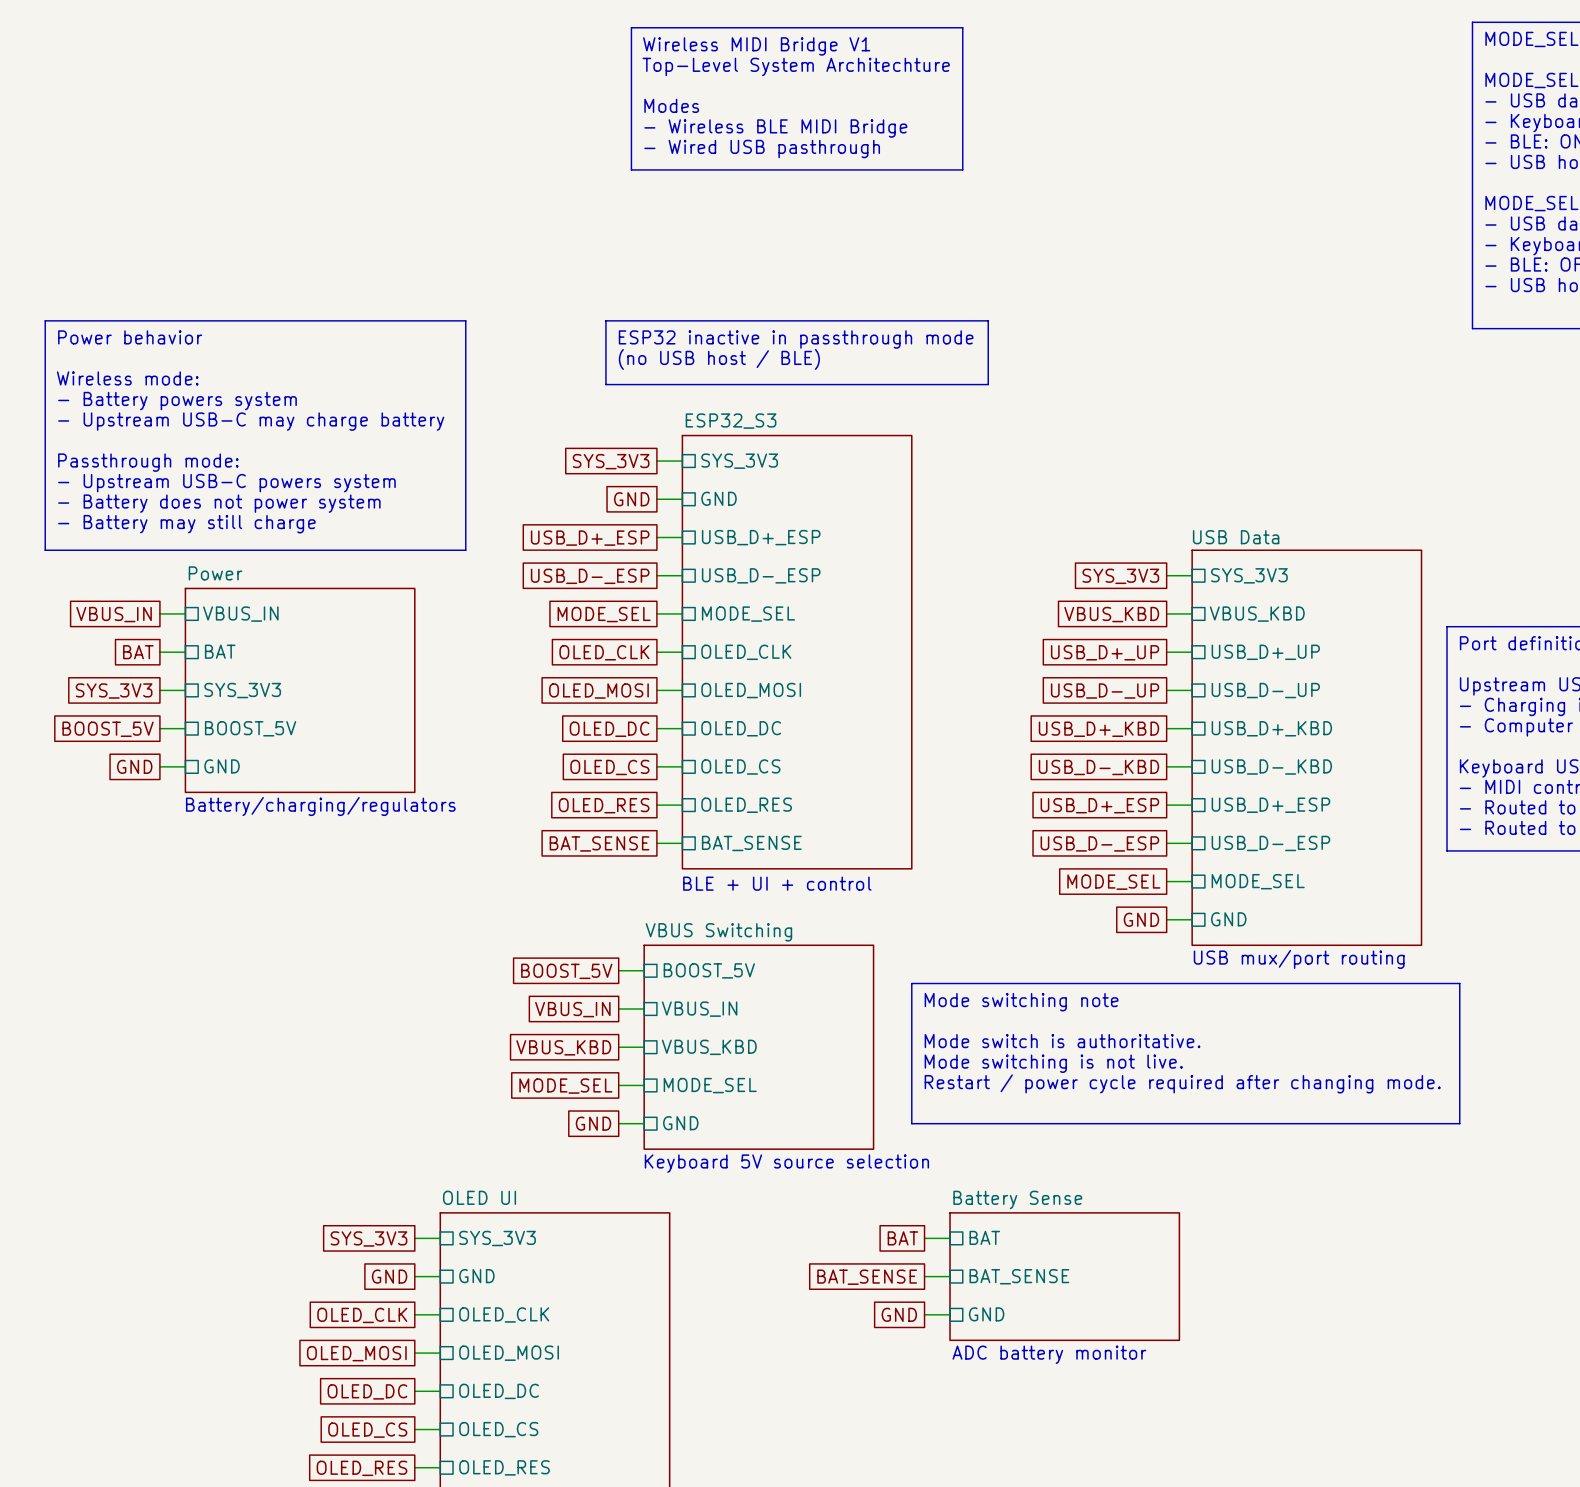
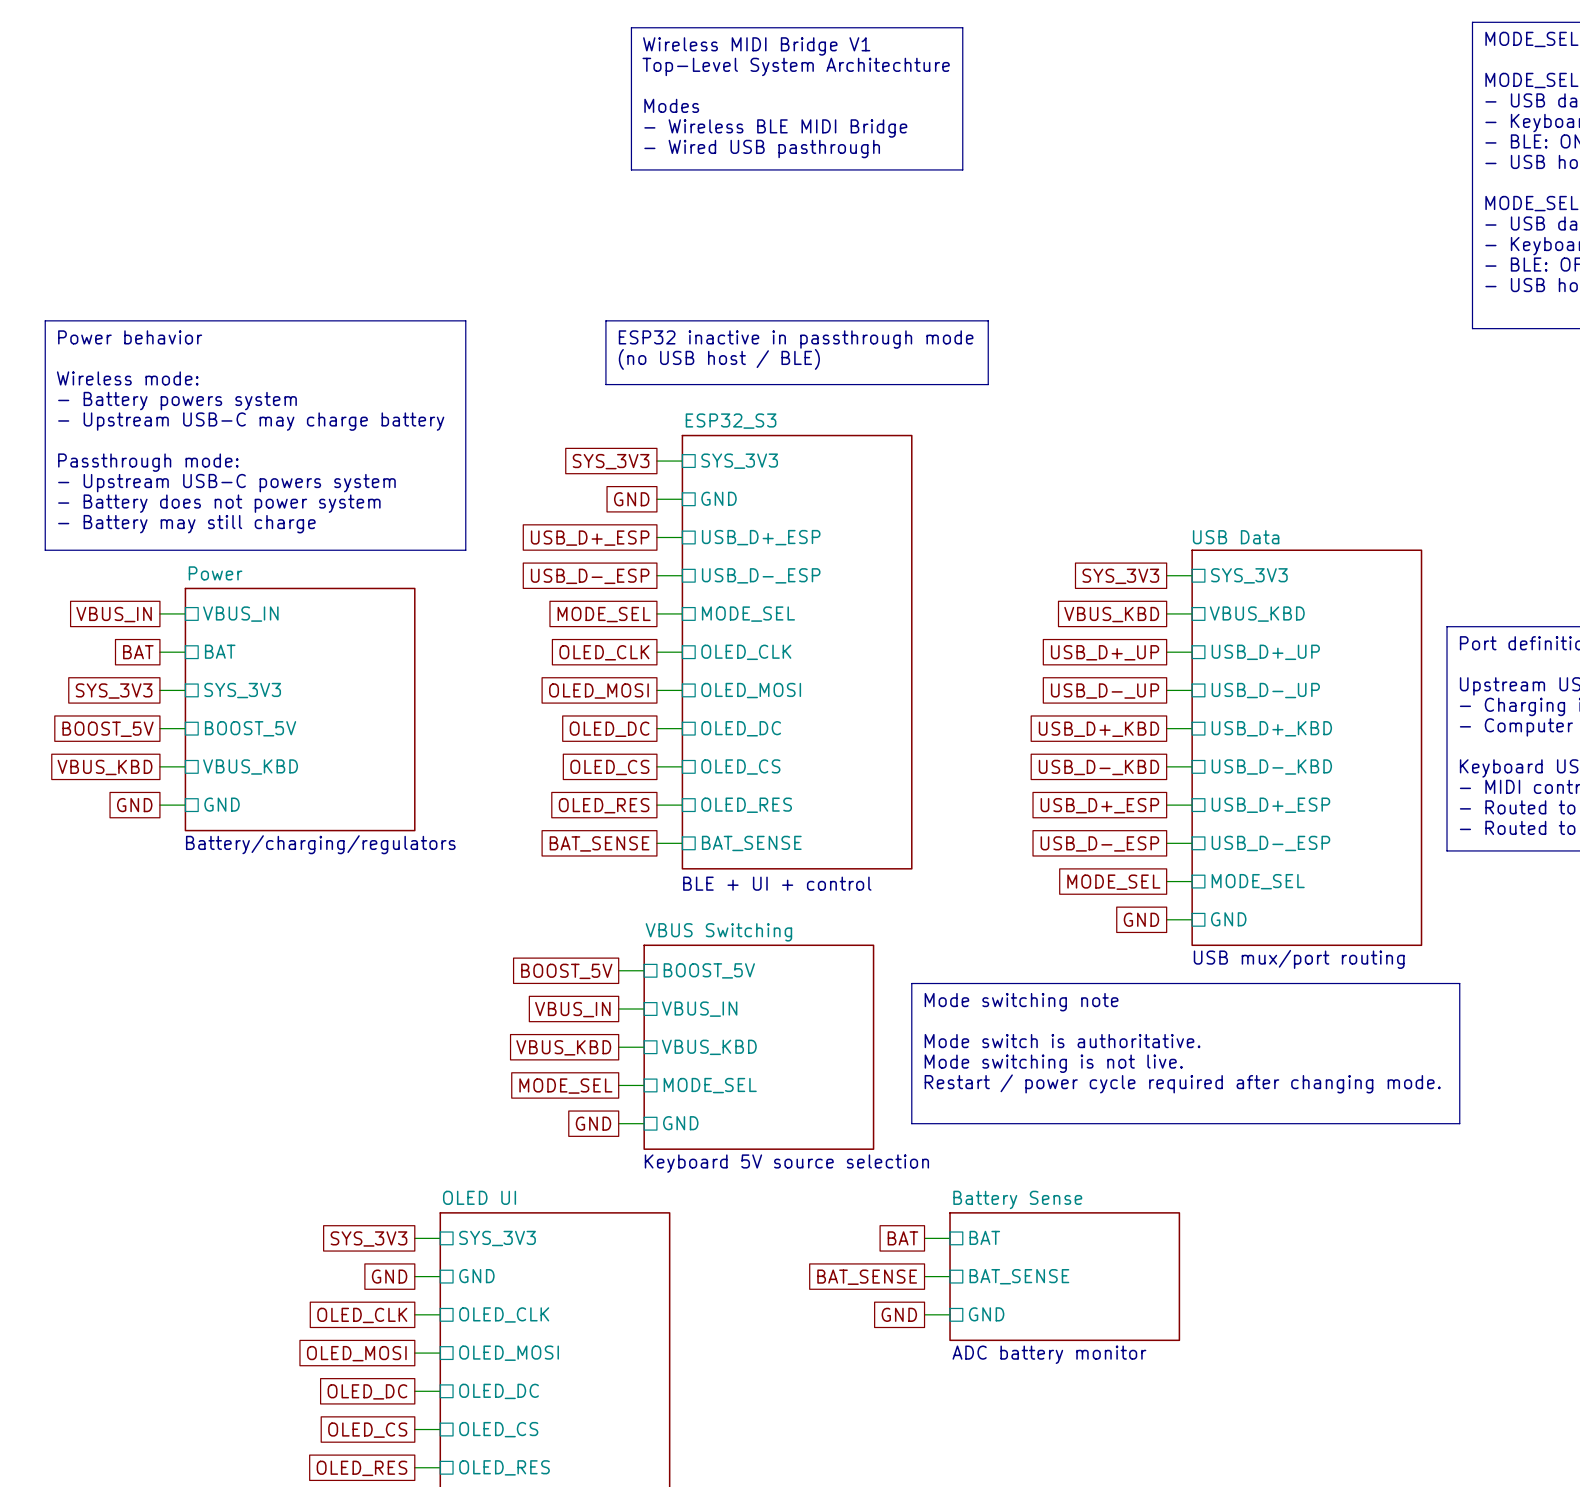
sheet Power: (300, 690) -> none
sheet Power: none -> (300, 709)
global label: GND (134, 766) -> VBUS_KBD (105, 767)
sheet pin: GND (222, 766) -> VBUS_KBD (250, 767)
sheet pin: none -> GND (222, 804)
global label: none -> GND (134, 805)
wire: none -> (159, 805) (185, 805)
text position: Battery/charging/regulators (320, 806) -> Battery/charging/regulators (320, 844)

